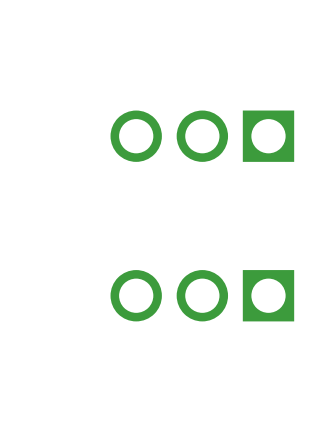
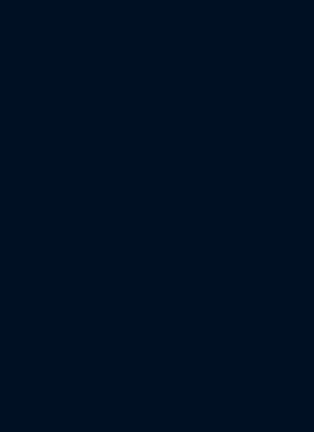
part: (202, 136) -> none
part: (202, 295) -> none

